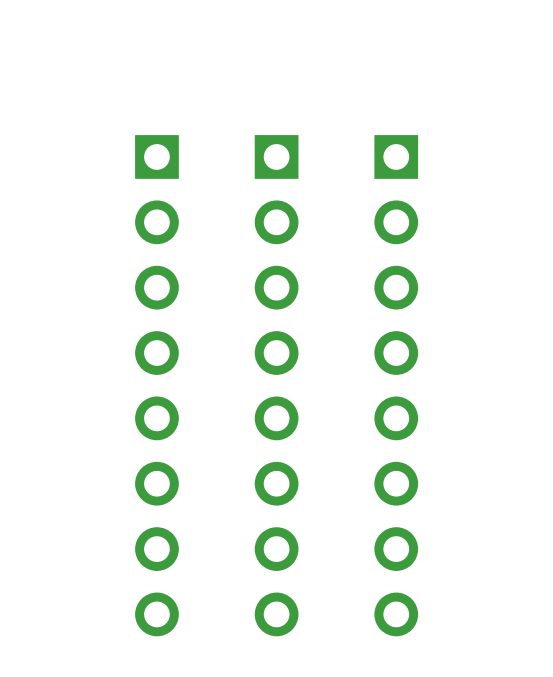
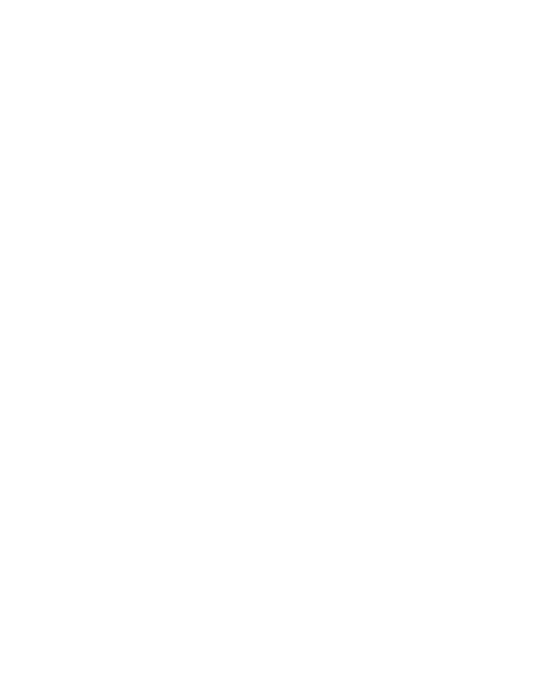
part: (156, 385) -> none
part: (276, 385) -> none
part: (396, 385) -> none

